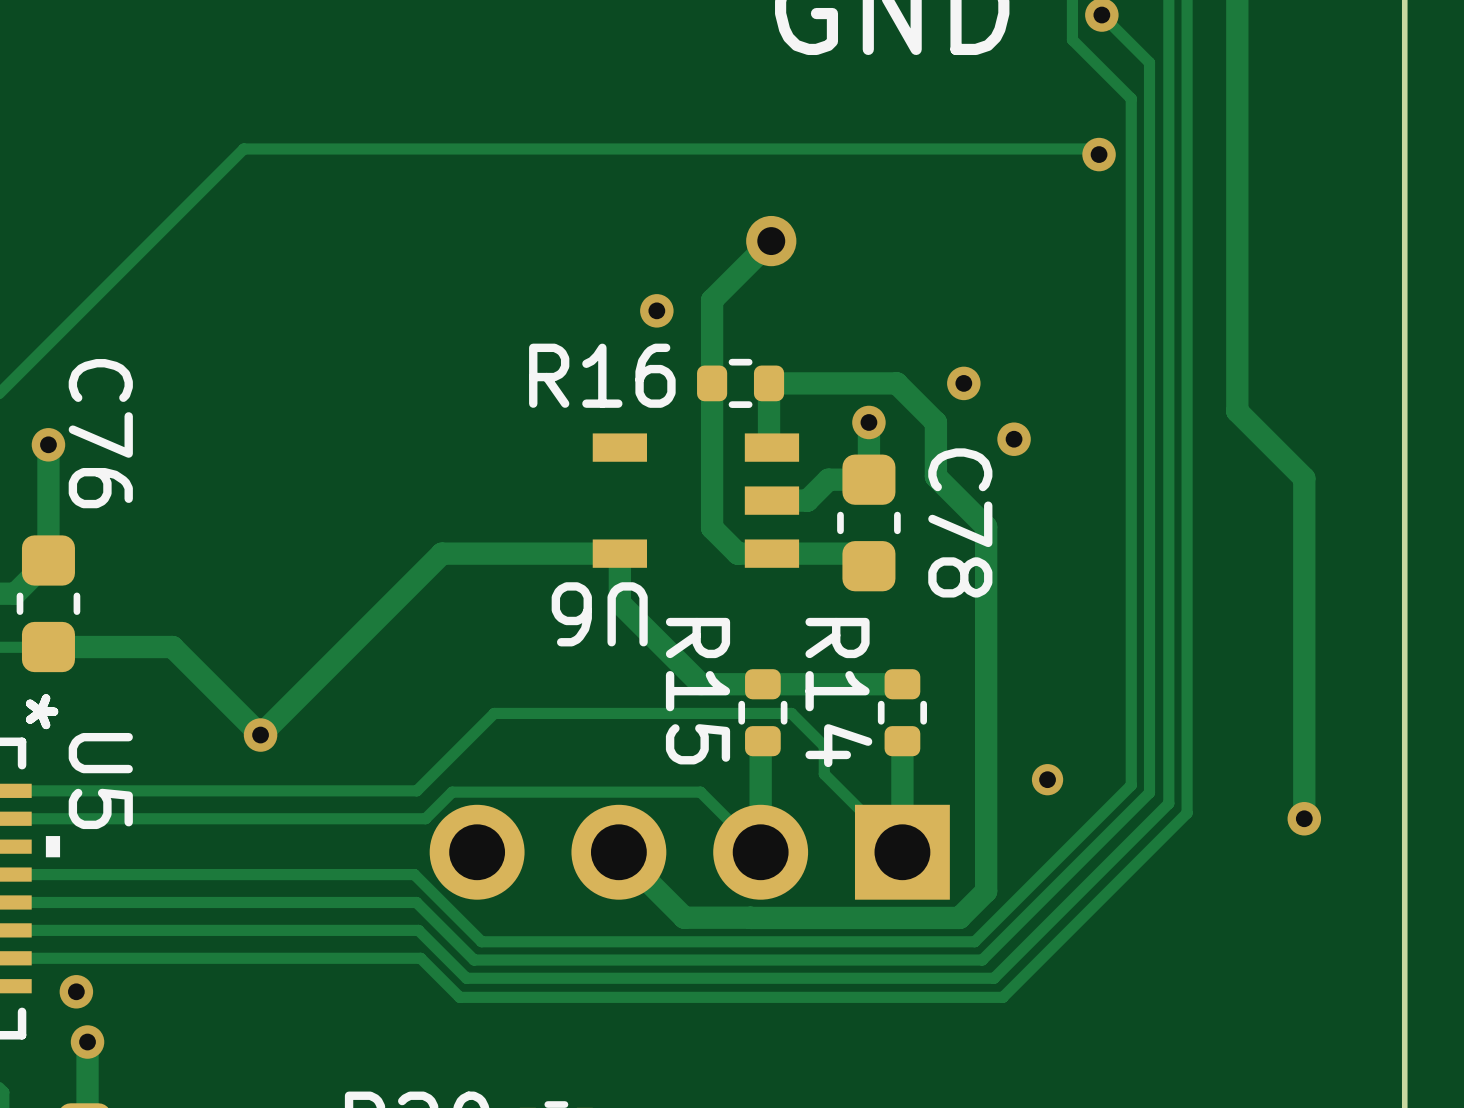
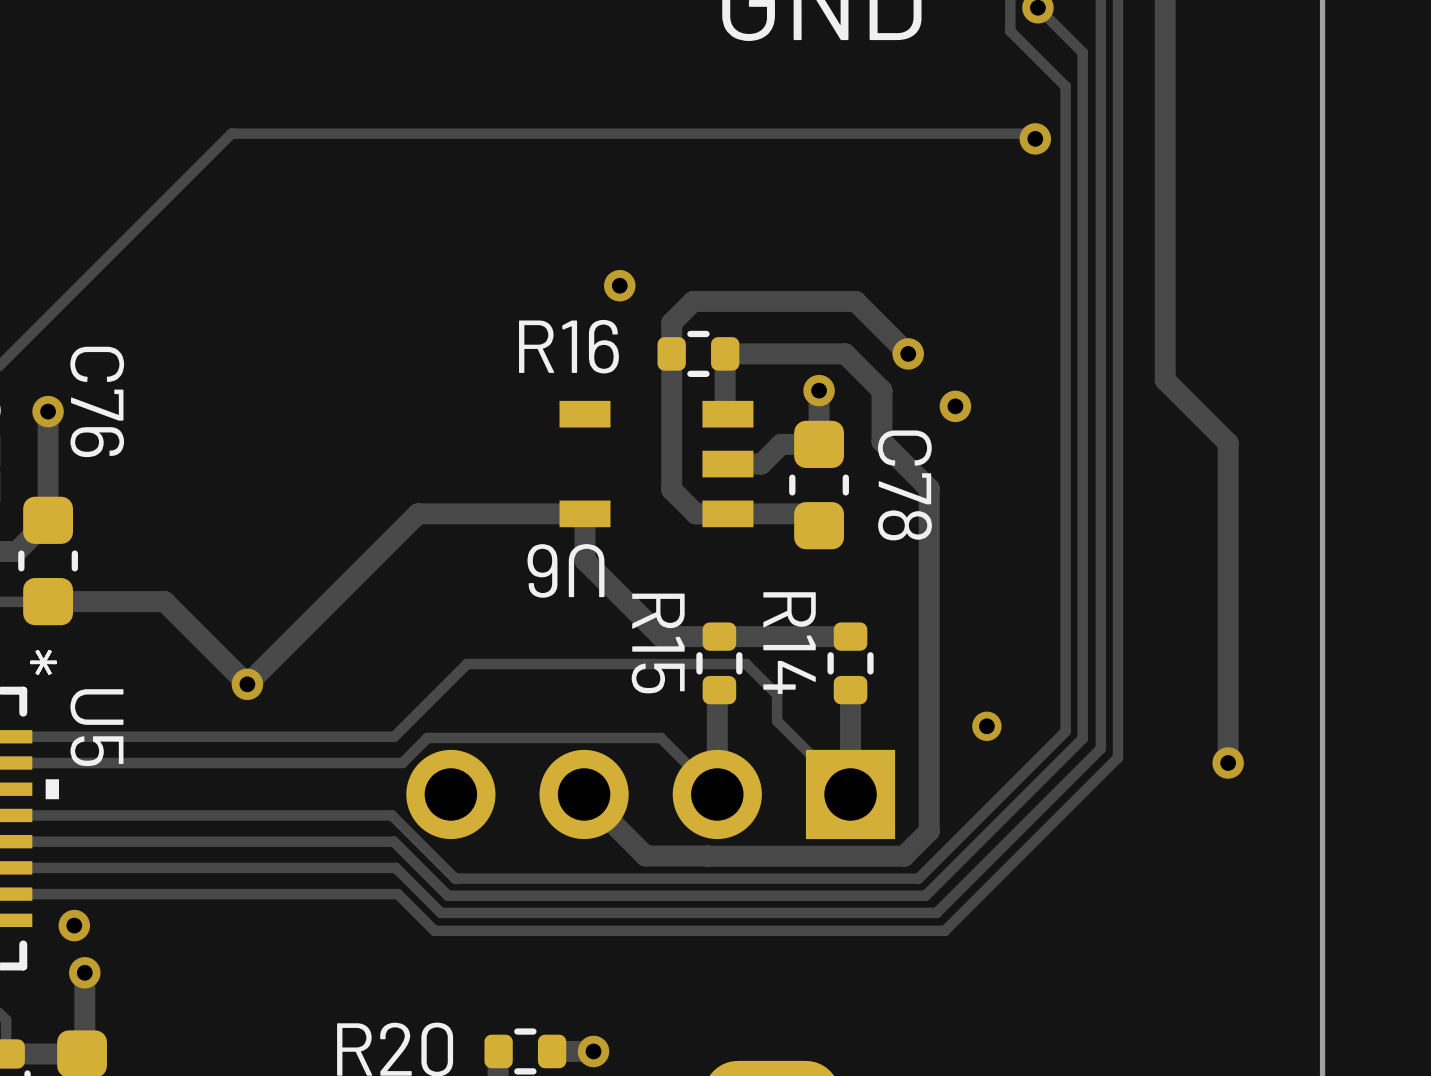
track: (771, 241) (712, 300) (712, 350) -> (908, 353) (855, 301) (693, 301) (671, 322)
via: (771, 241) -> none

